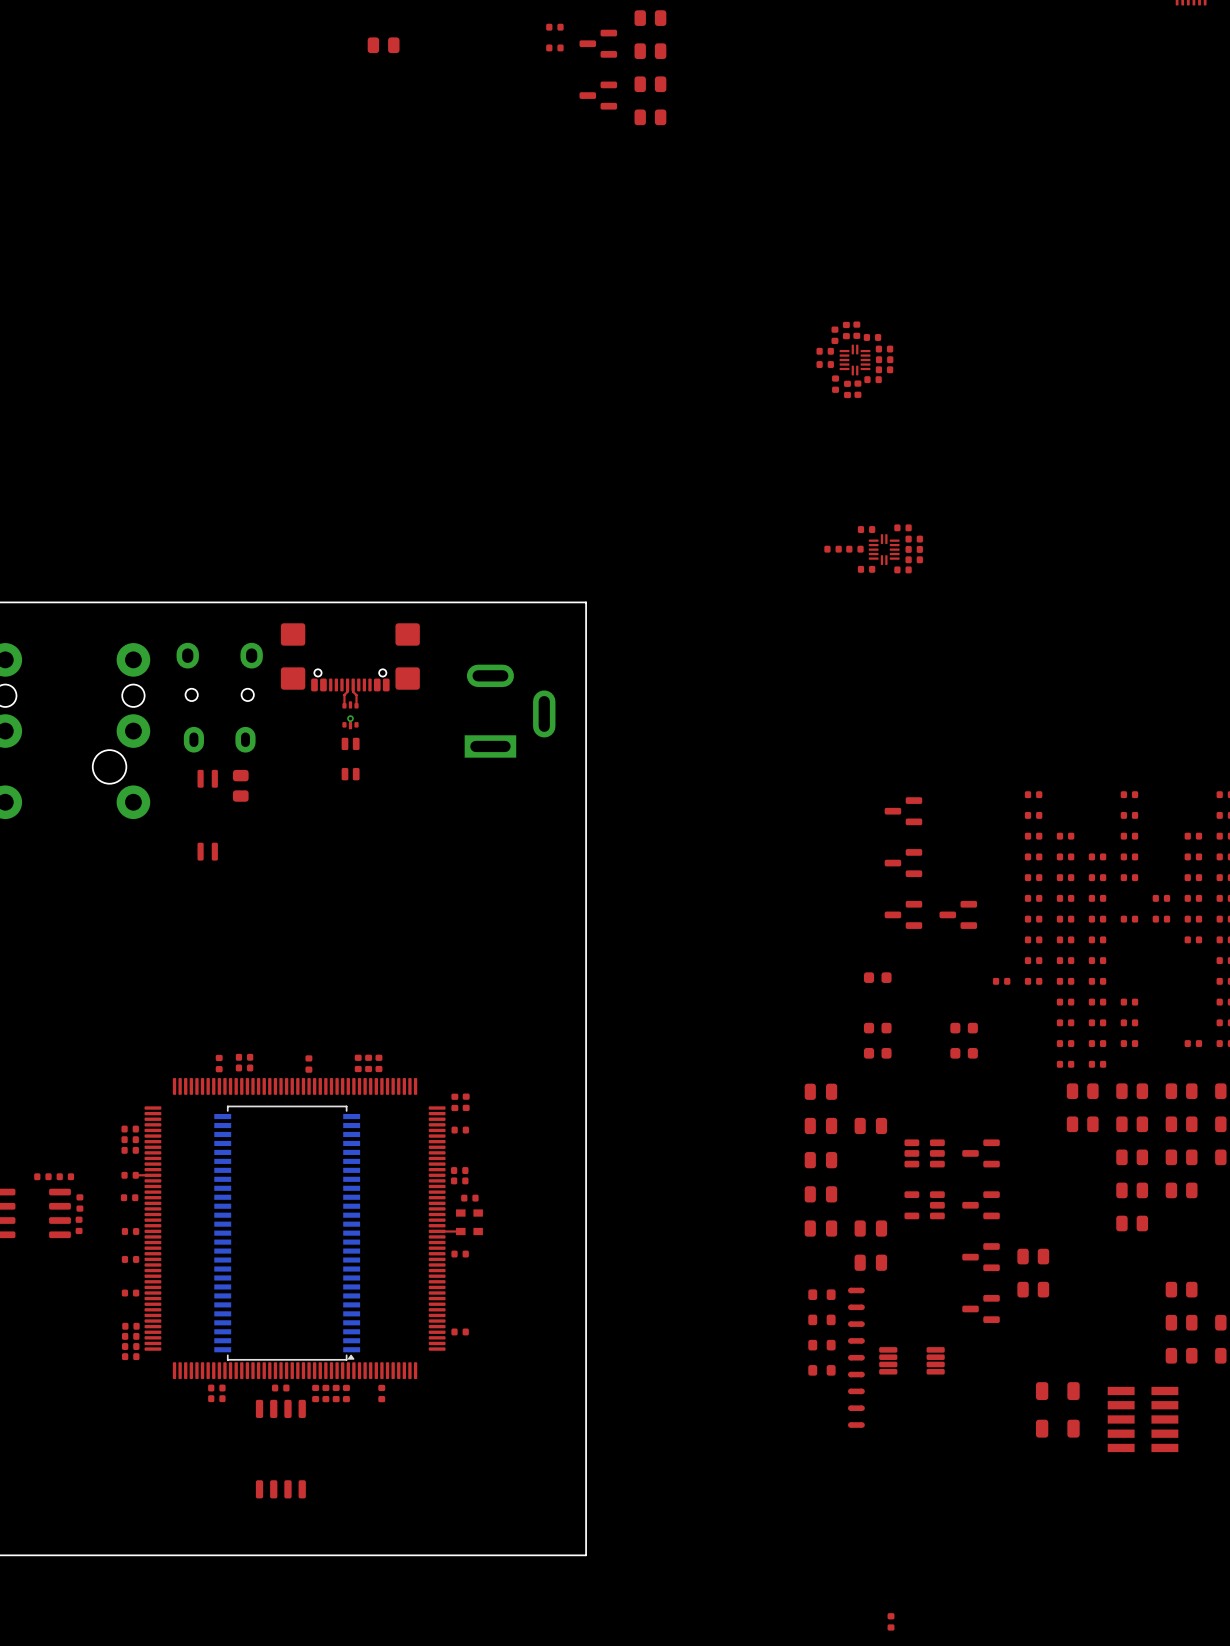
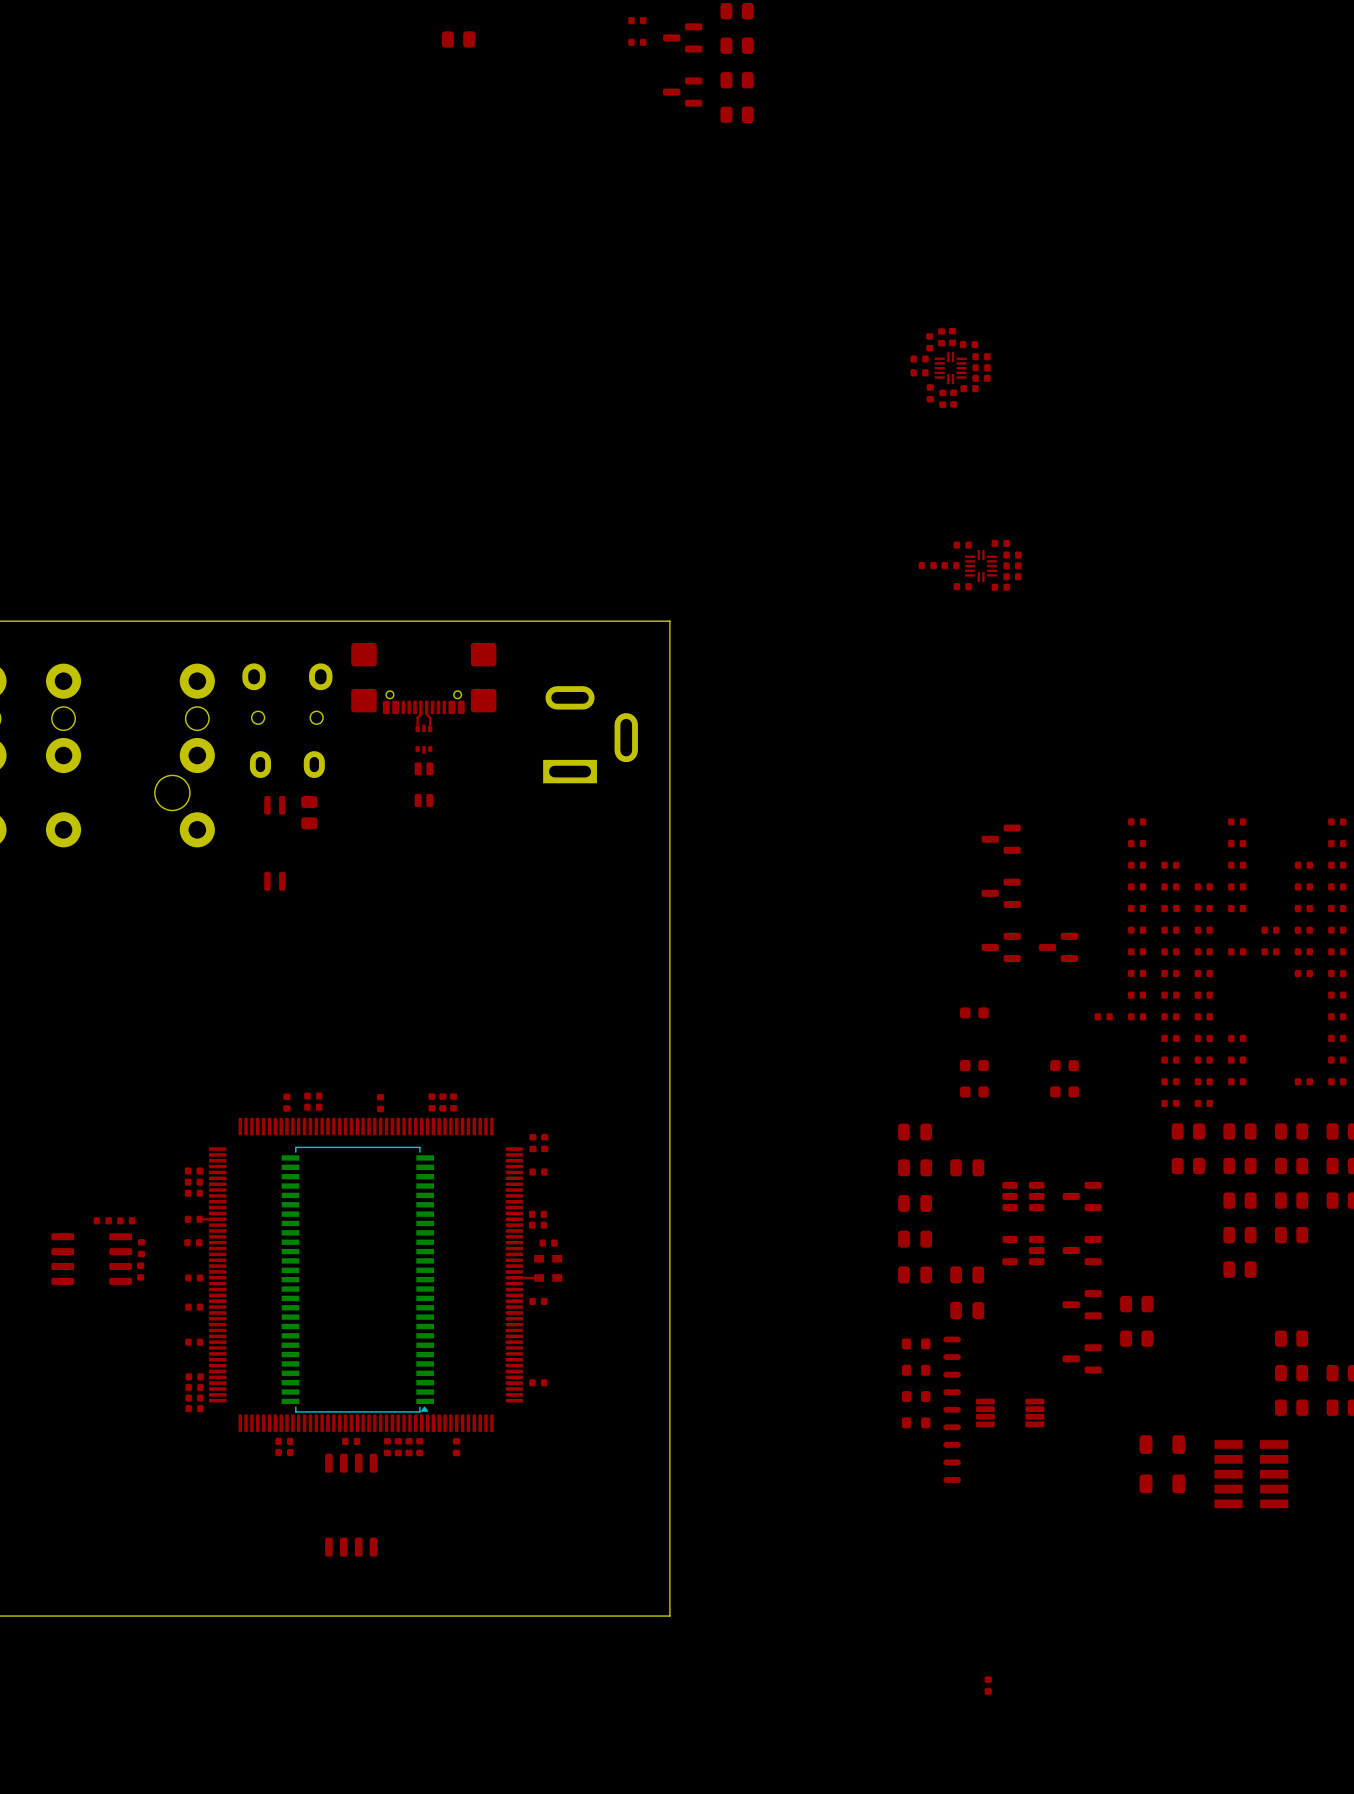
via: (350, 718) -> none

